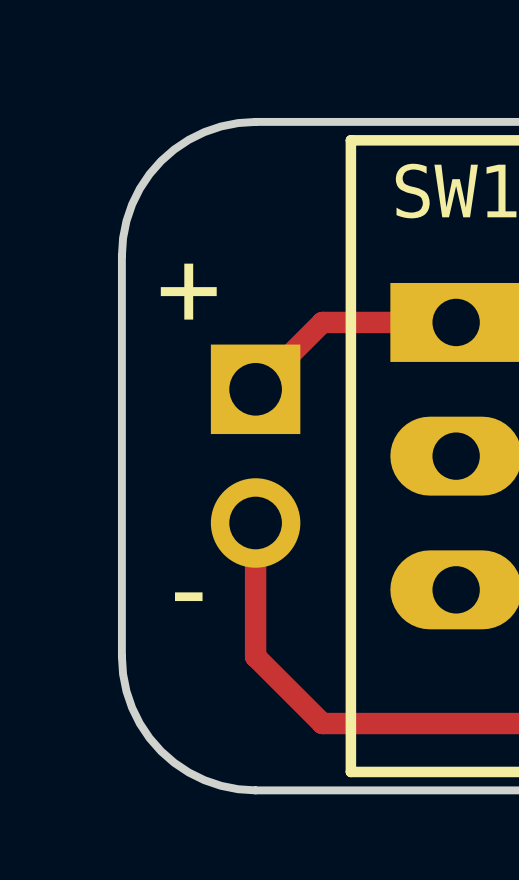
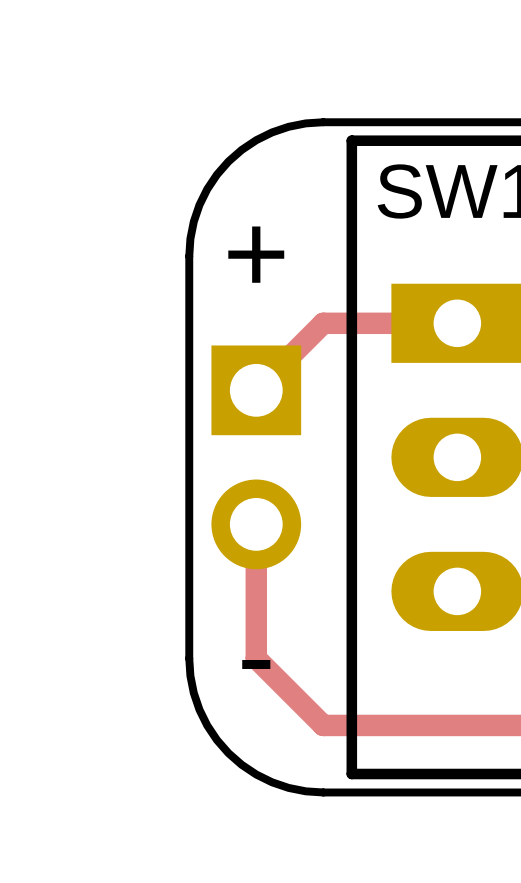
board edge: (322, 121) (238, 123) (221, 126) (188, 139) (161, 161) (139, 188) (126, 221) (121, 255) (121, 656) (126, 691) (132, 707) (149, 738) (161, 751) (188, 772) (204, 780) (238, 789) (322, 790) -> (323, 122) (288, 126) (272, 132) (256, 140) (228, 161) (207, 189) (199, 204) (190, 238) (189, 256) (189, 658) (193, 693) (199, 709) (216, 740) (241, 764) (256, 774) (288, 787) (323, 792)
text position: + (188, 291) -> + (256, 254)
text position: - (188, 596) -> - (256, 664)

